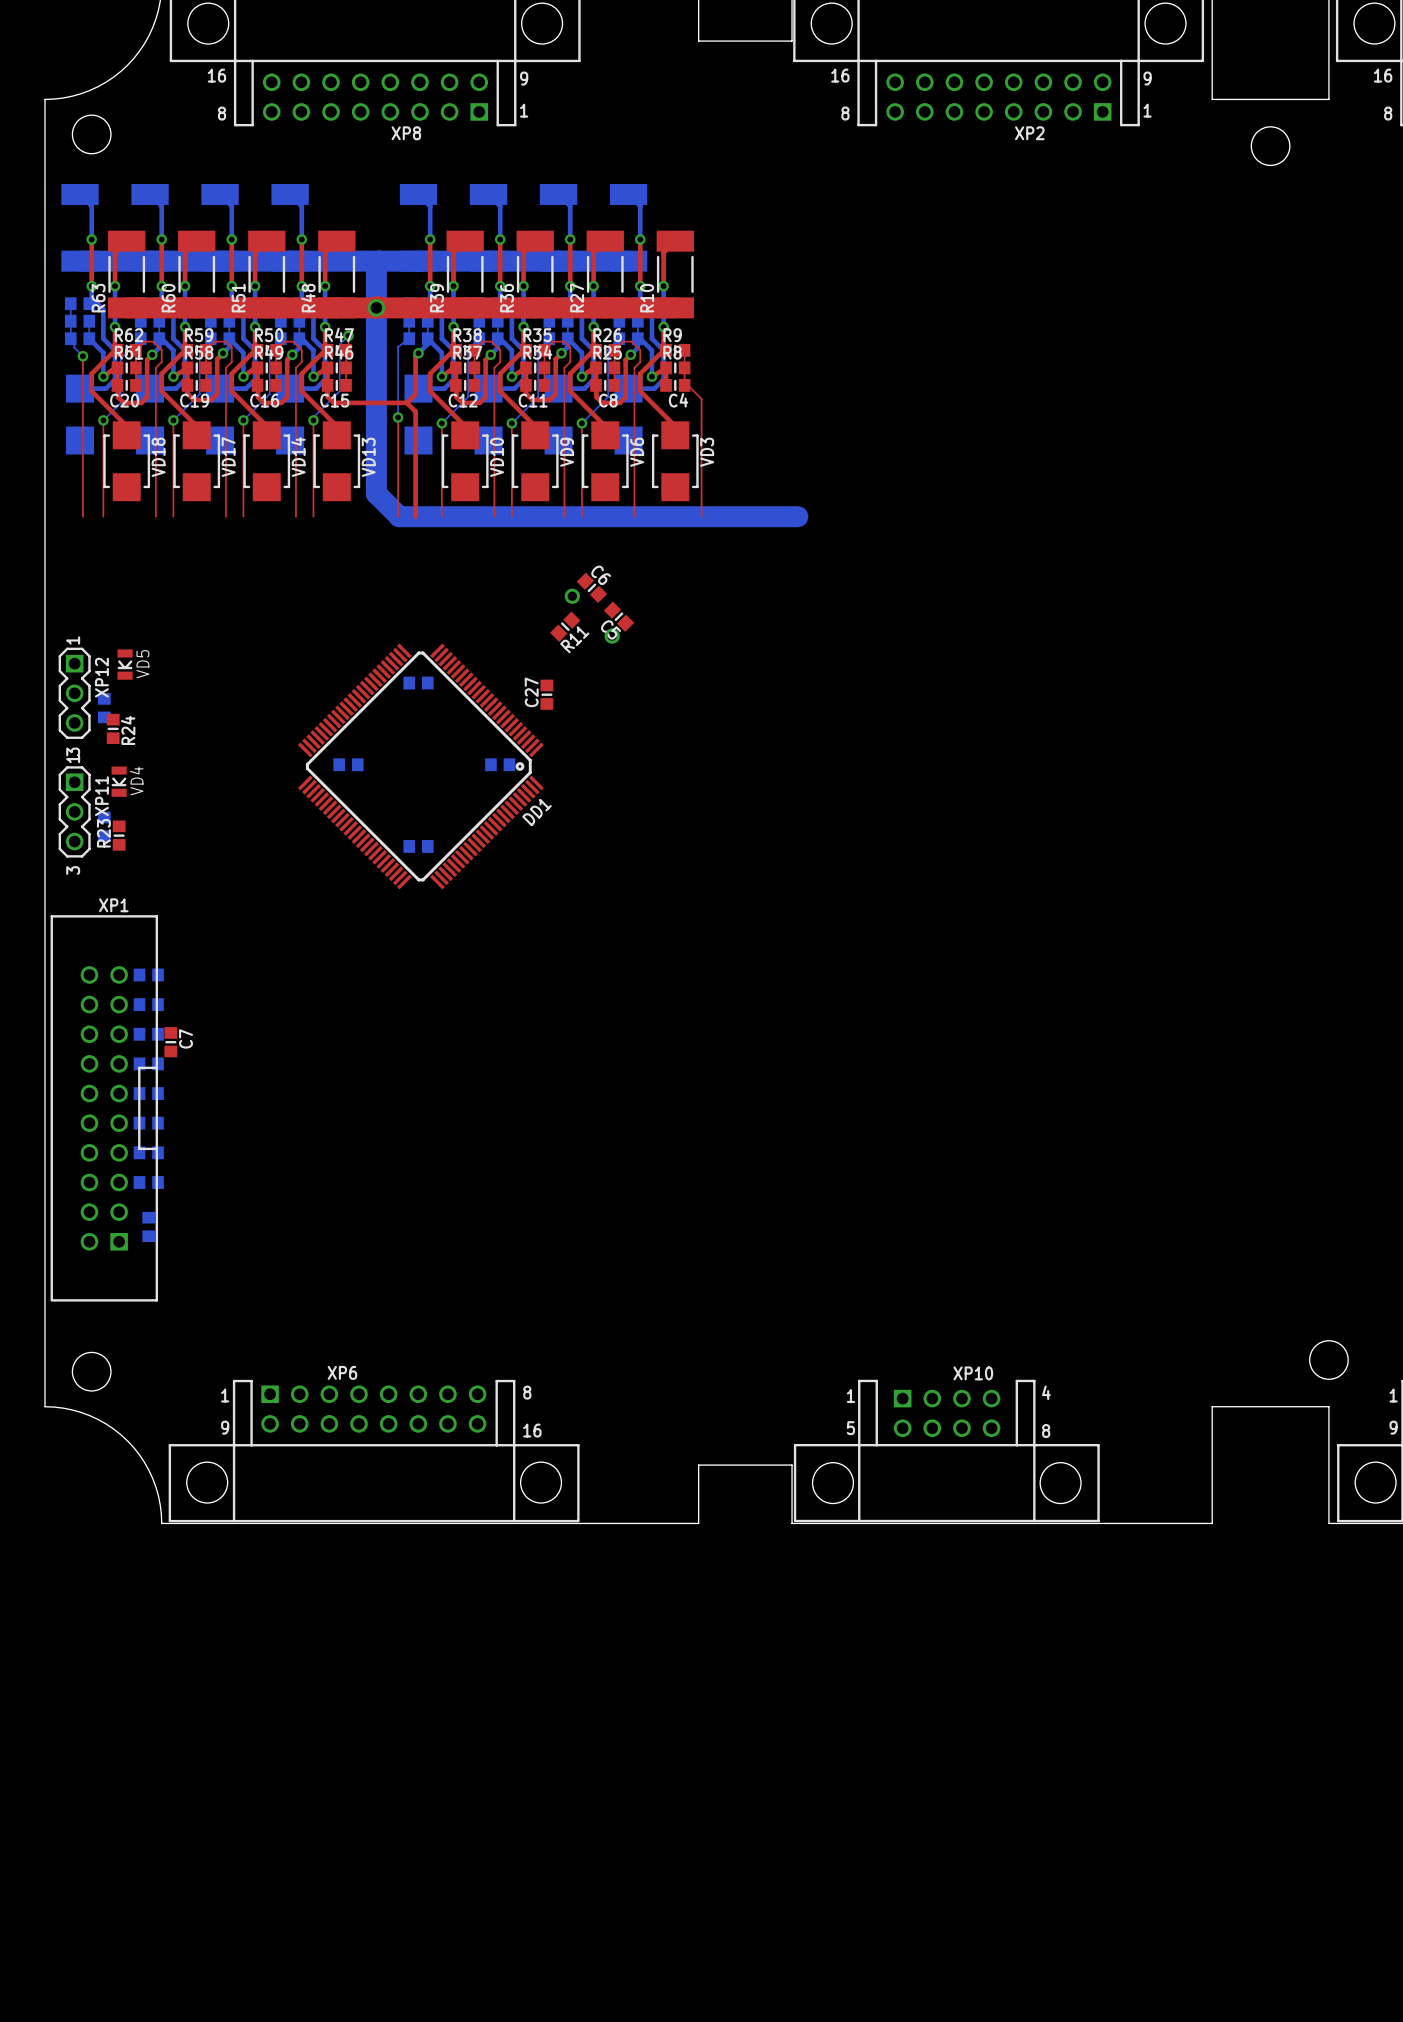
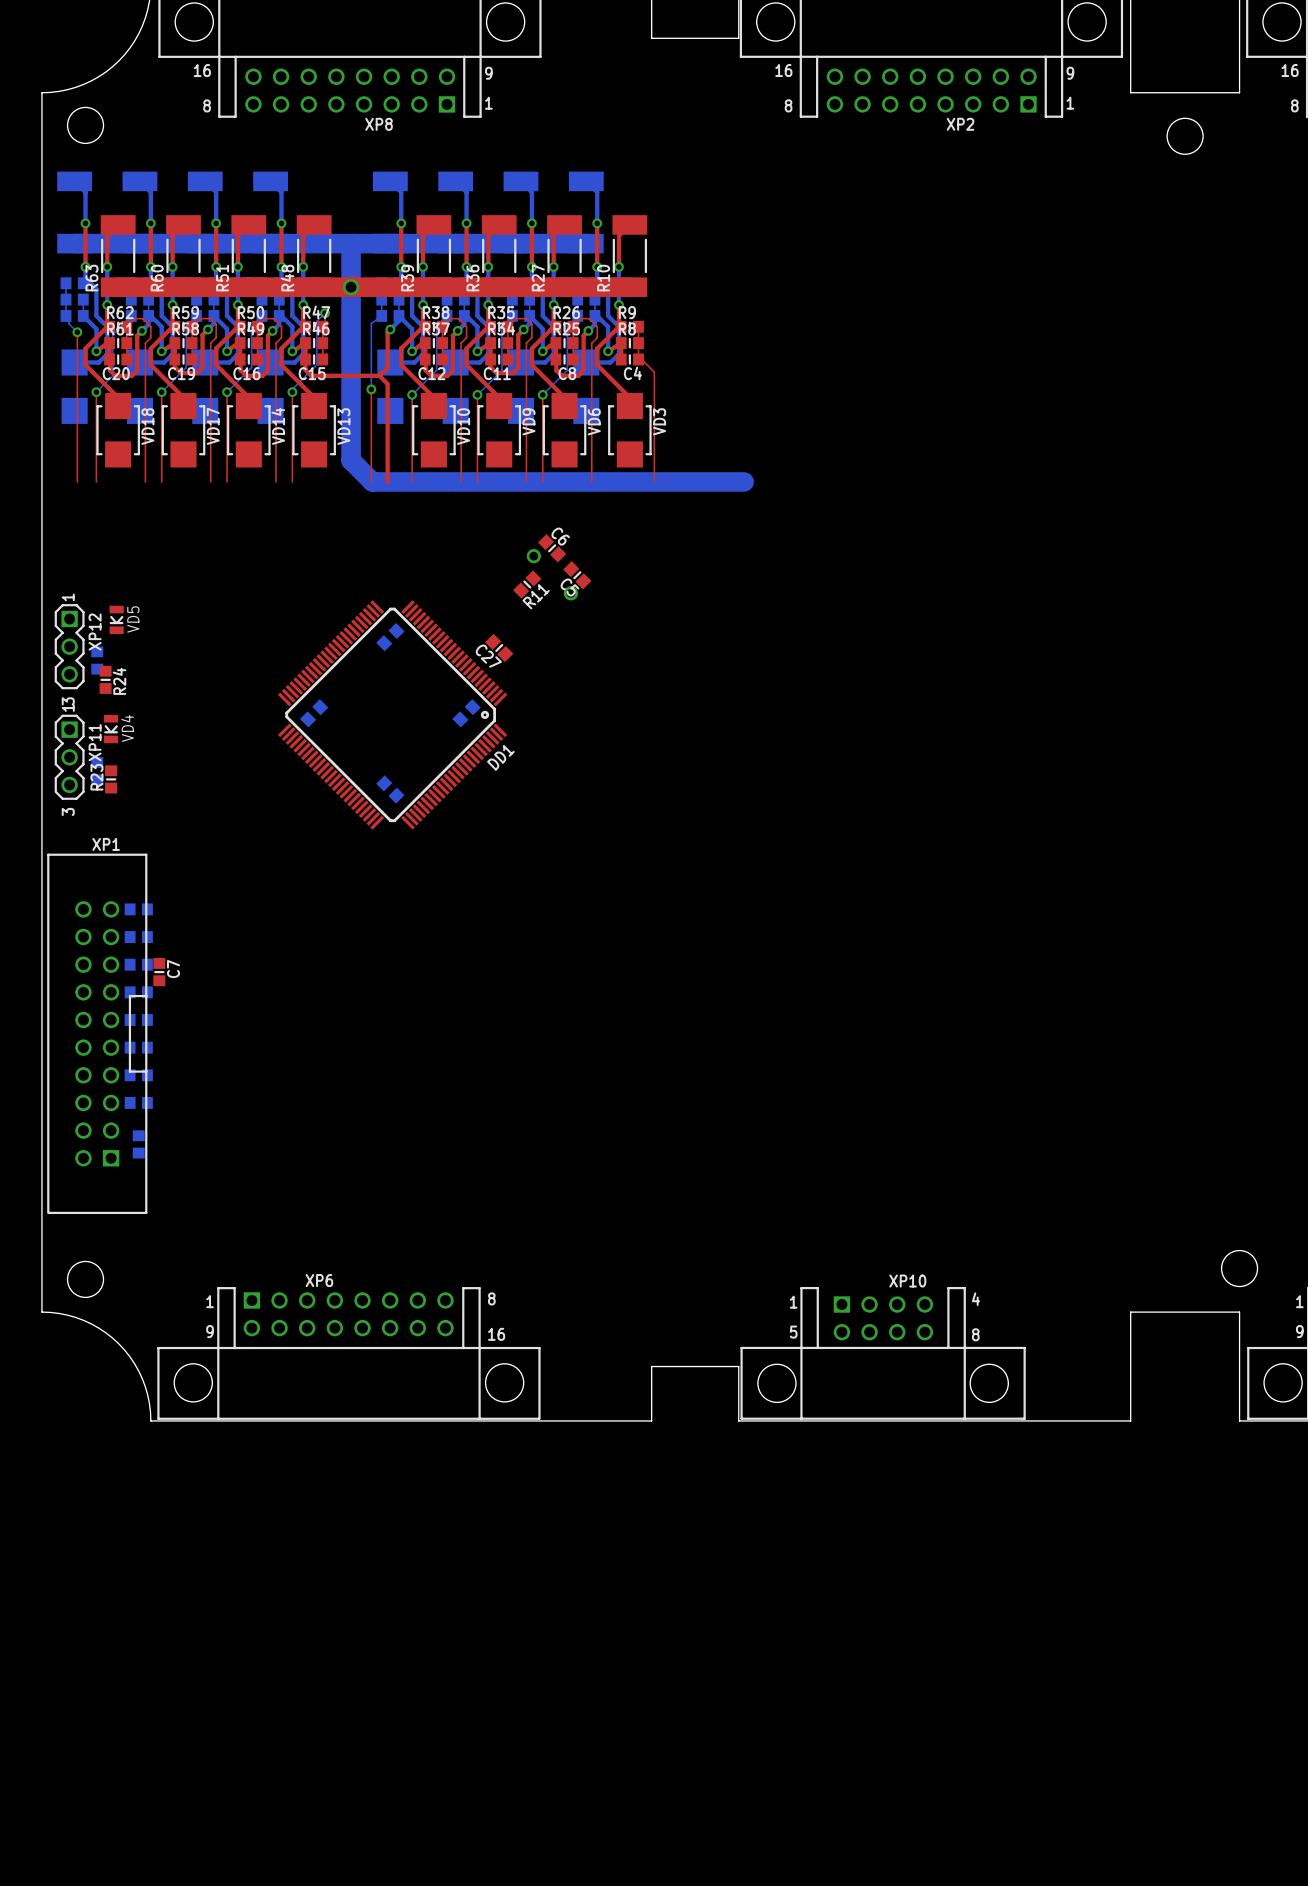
part rotation: 0° (418, 683) -> 45° counterclockwise (390, 637)
C27 rotation: 0° (546, 694) -> 45° counterclockwise (499, 647)
part rotation: 0° (348, 764) -> 45° counterclockwise (314, 713)
part rotation: 0° (500, 764) -> 45° counterclockwise (466, 713)
part rotation: 0° (418, 846) -> 45° clockwise (390, 789)

